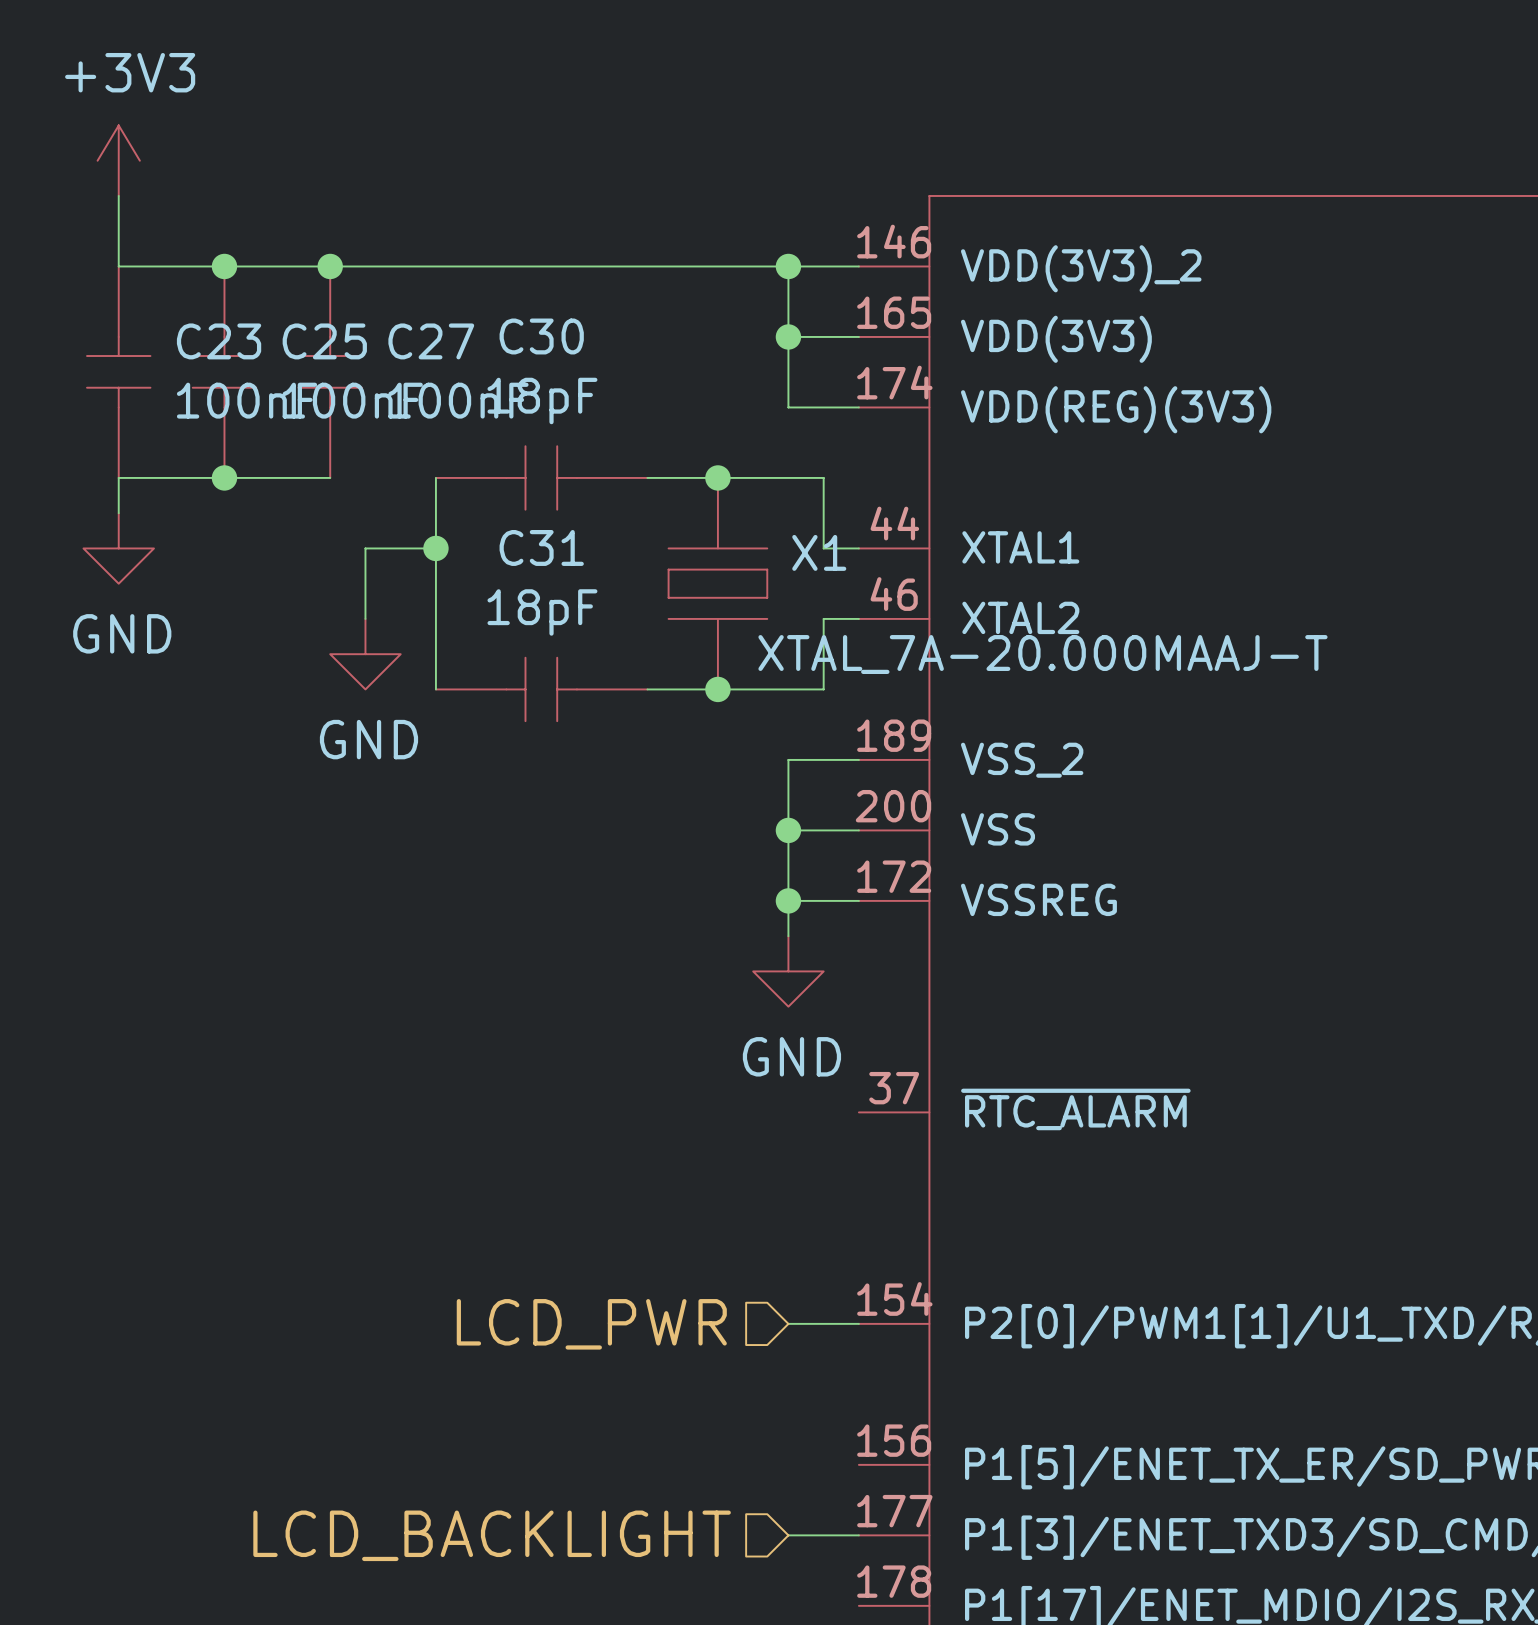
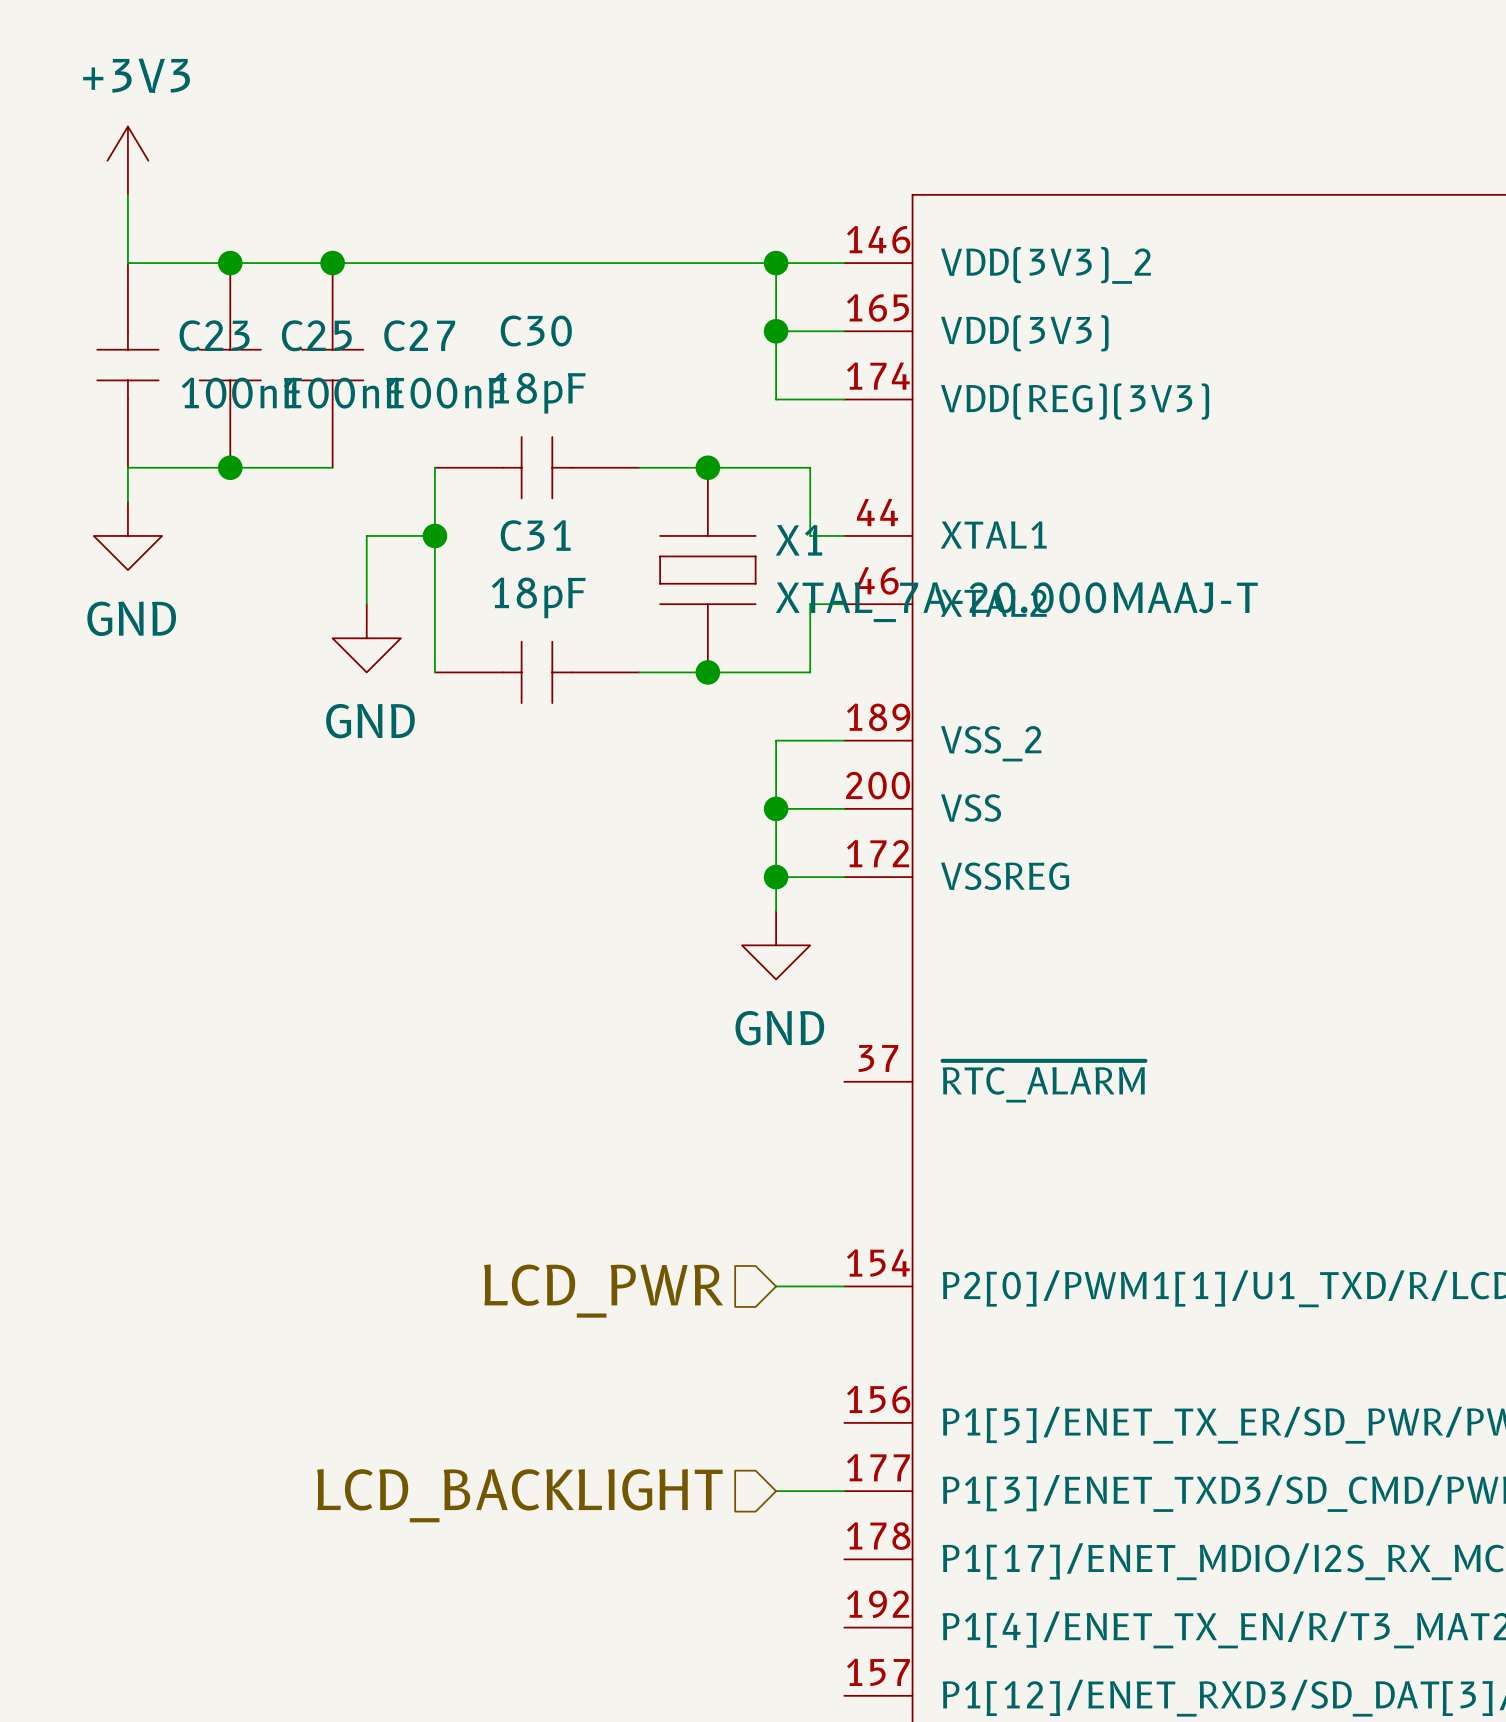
X1 value position: XTAL_7A-20.000MAAJ-T (1042, 654) -> XTAL_7A-20.000MAAJ-T (1016, 602)

